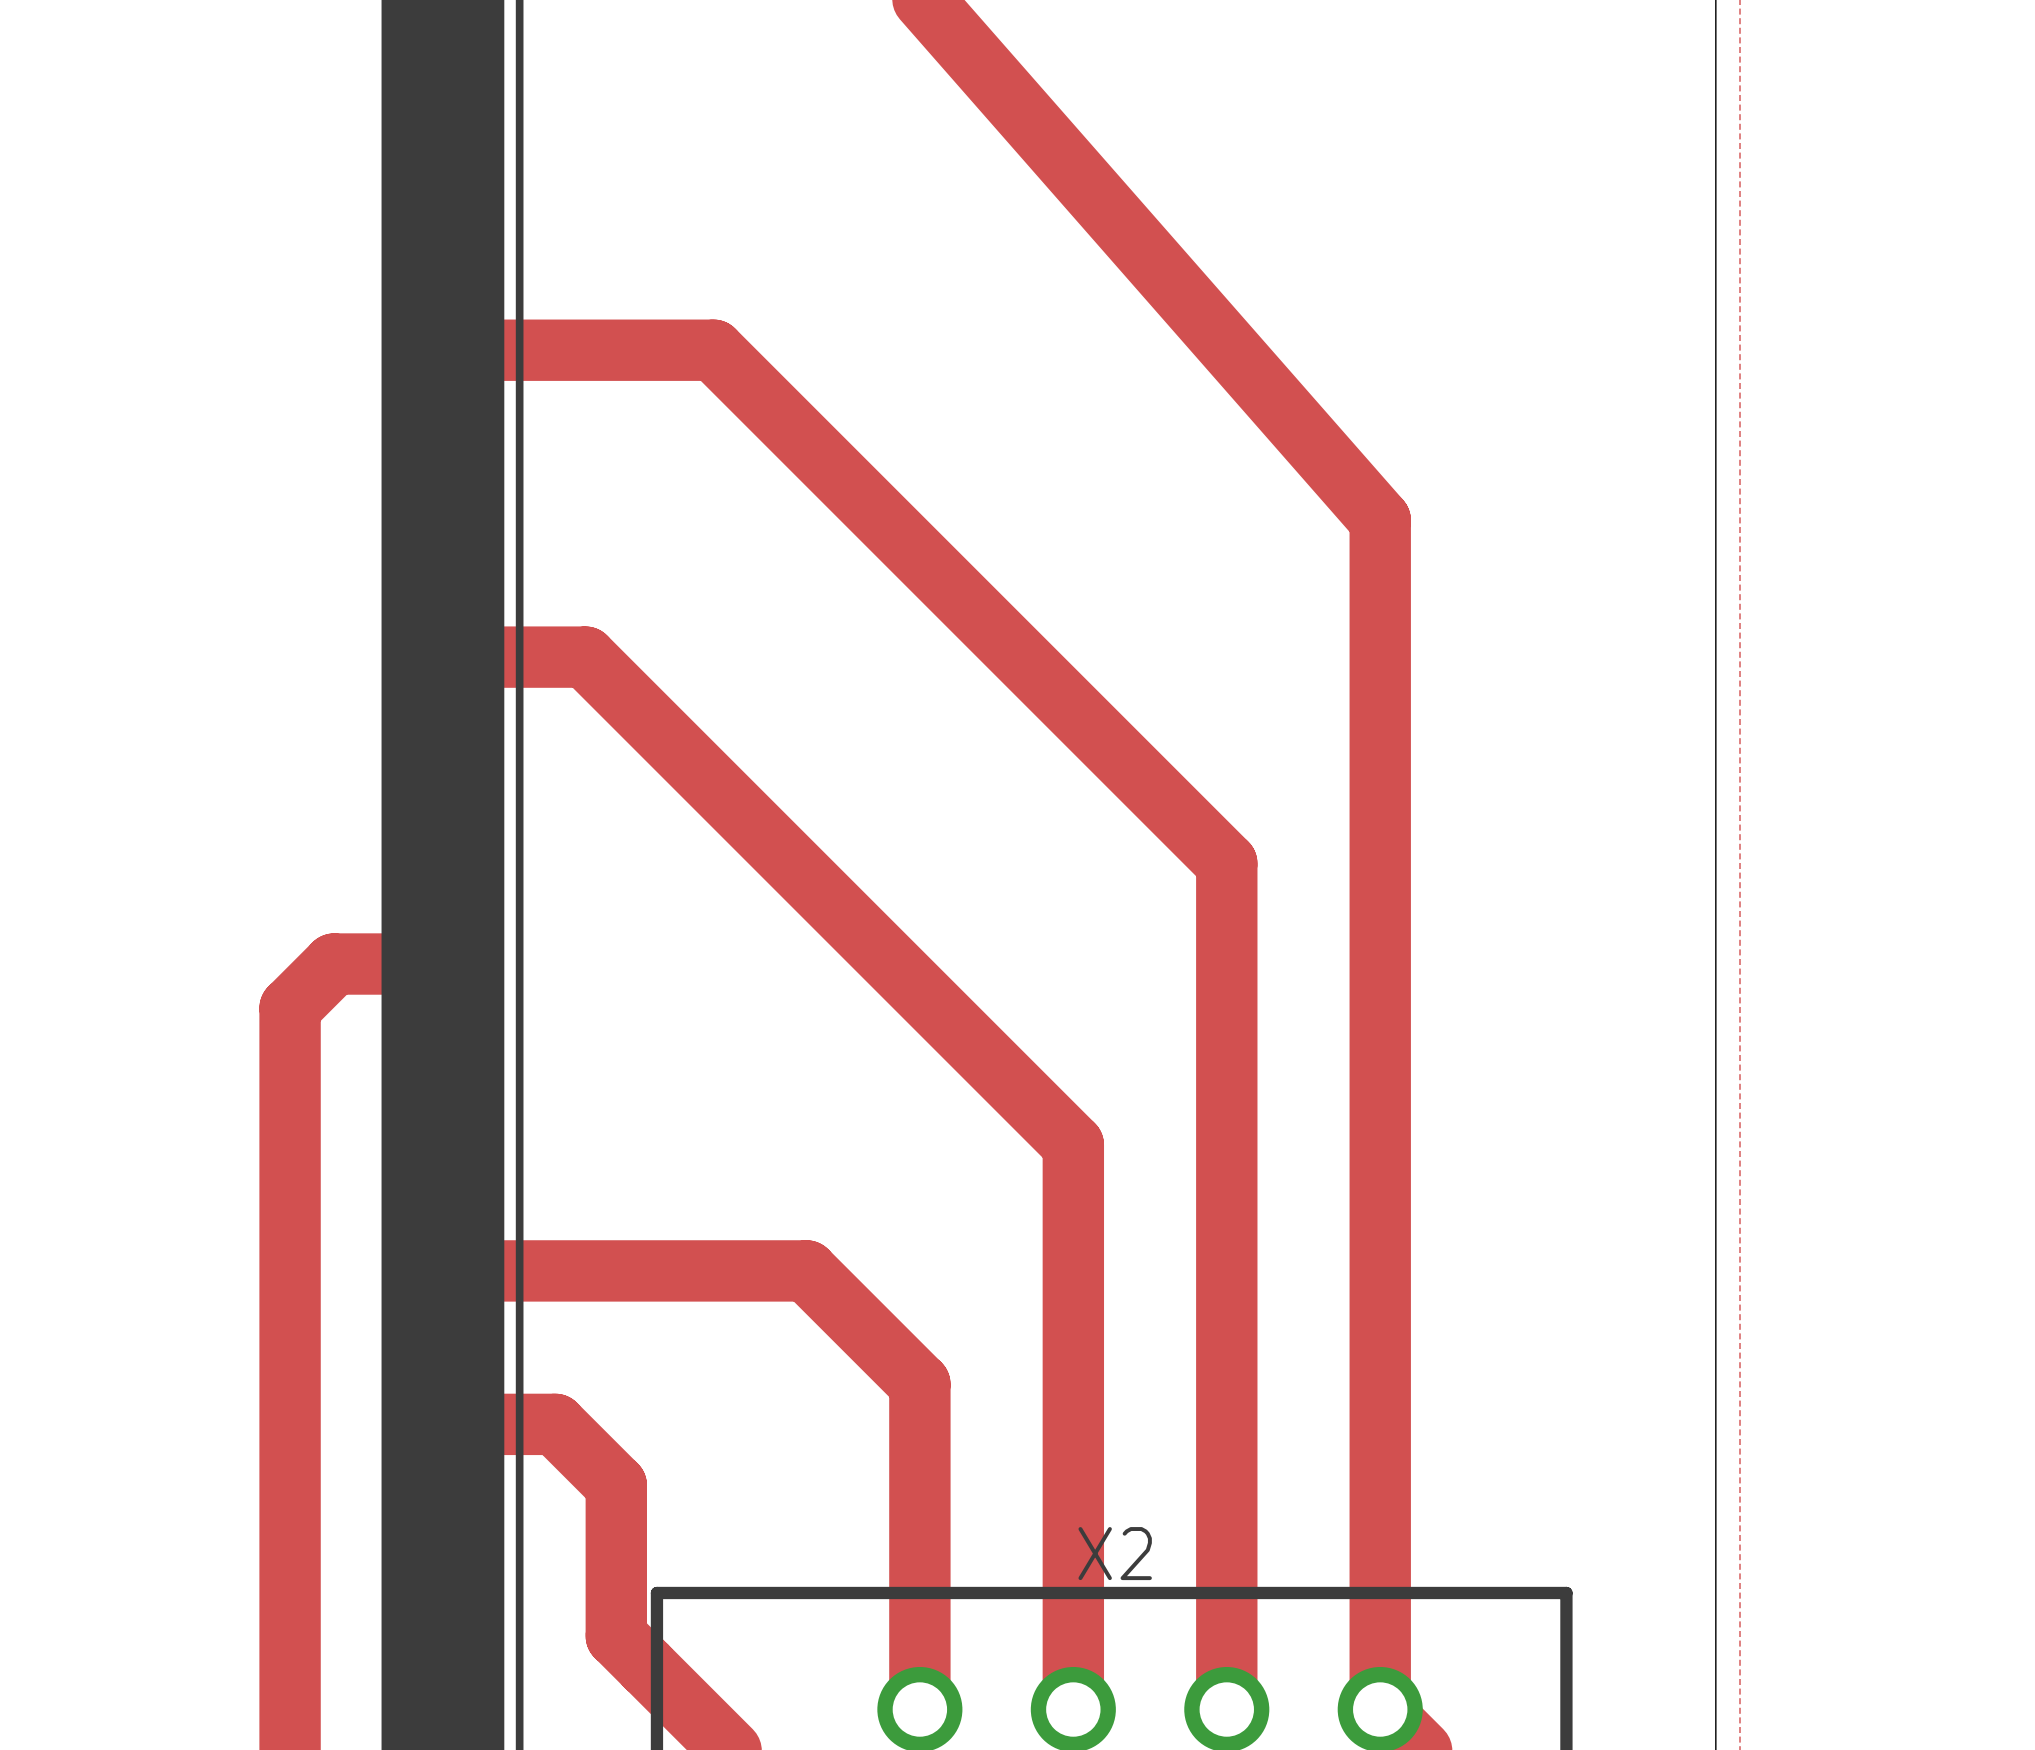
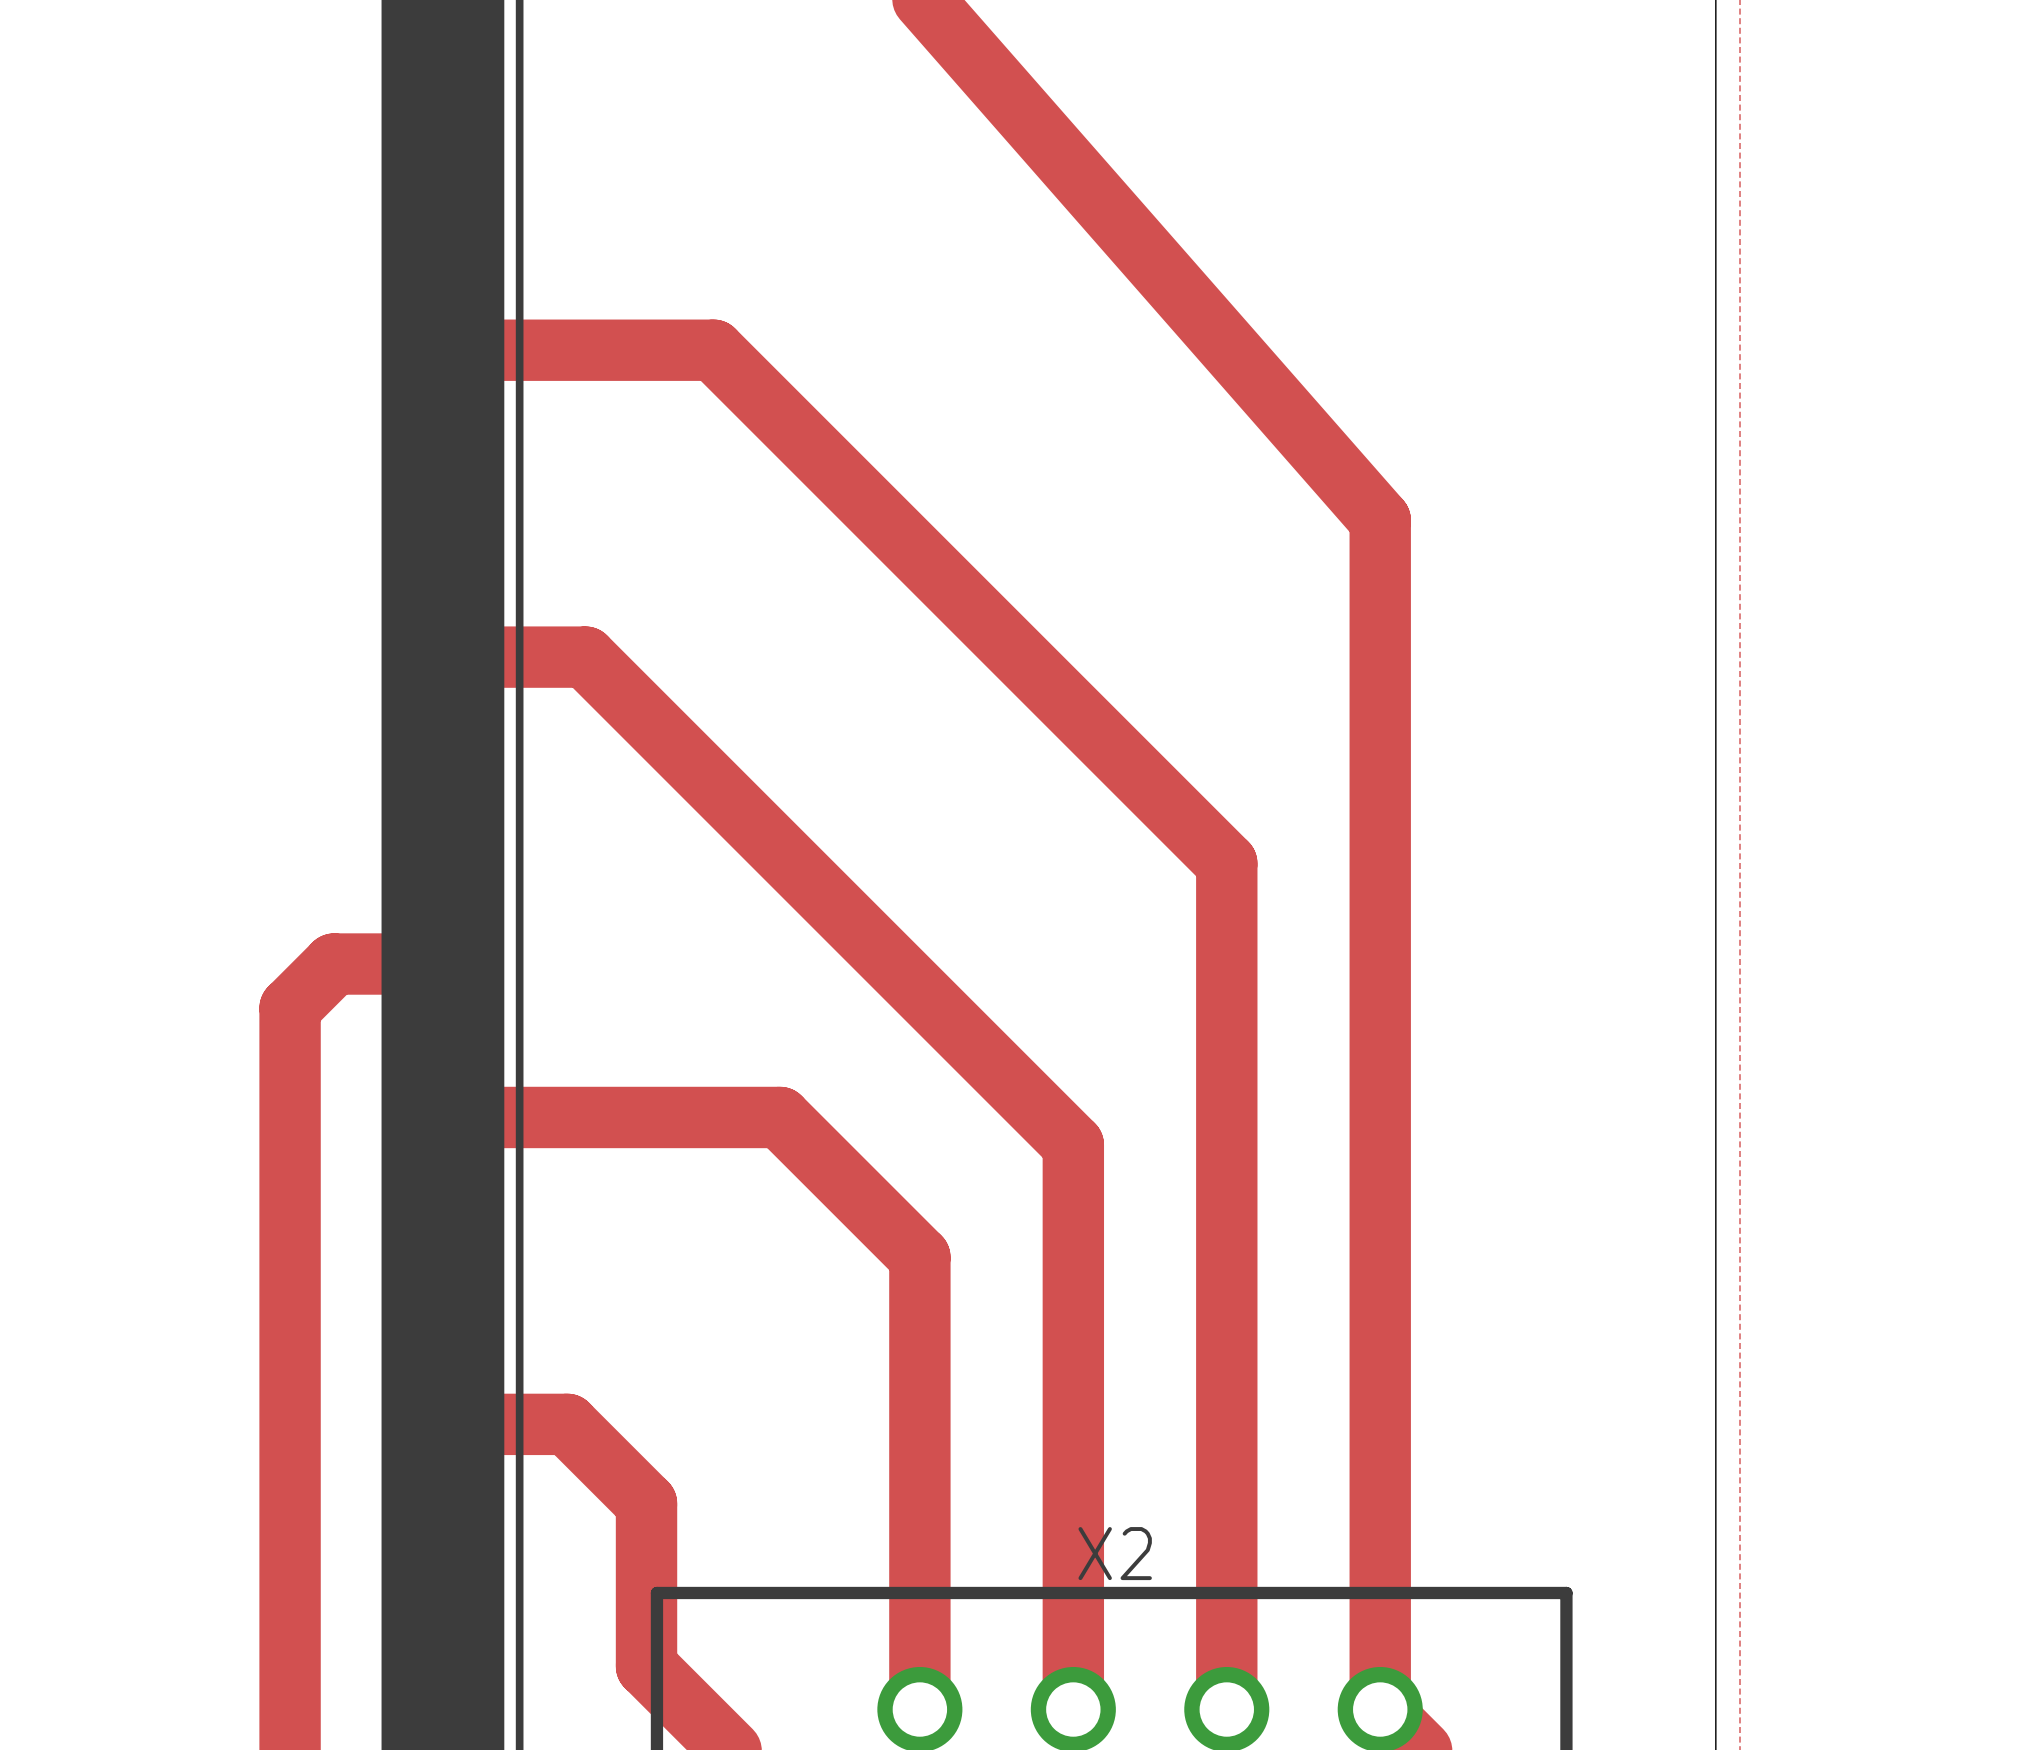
track: (442, 1270) (806, 1270) (919, 1384) -> (442, 1117) (780, 1117) (919, 1257) (919, 1384)
track: (555, 1424) (616, 1485) (616, 1636) (646, 1666) -> (555, 1424) (567, 1424) (646, 1503) (646, 1666)

